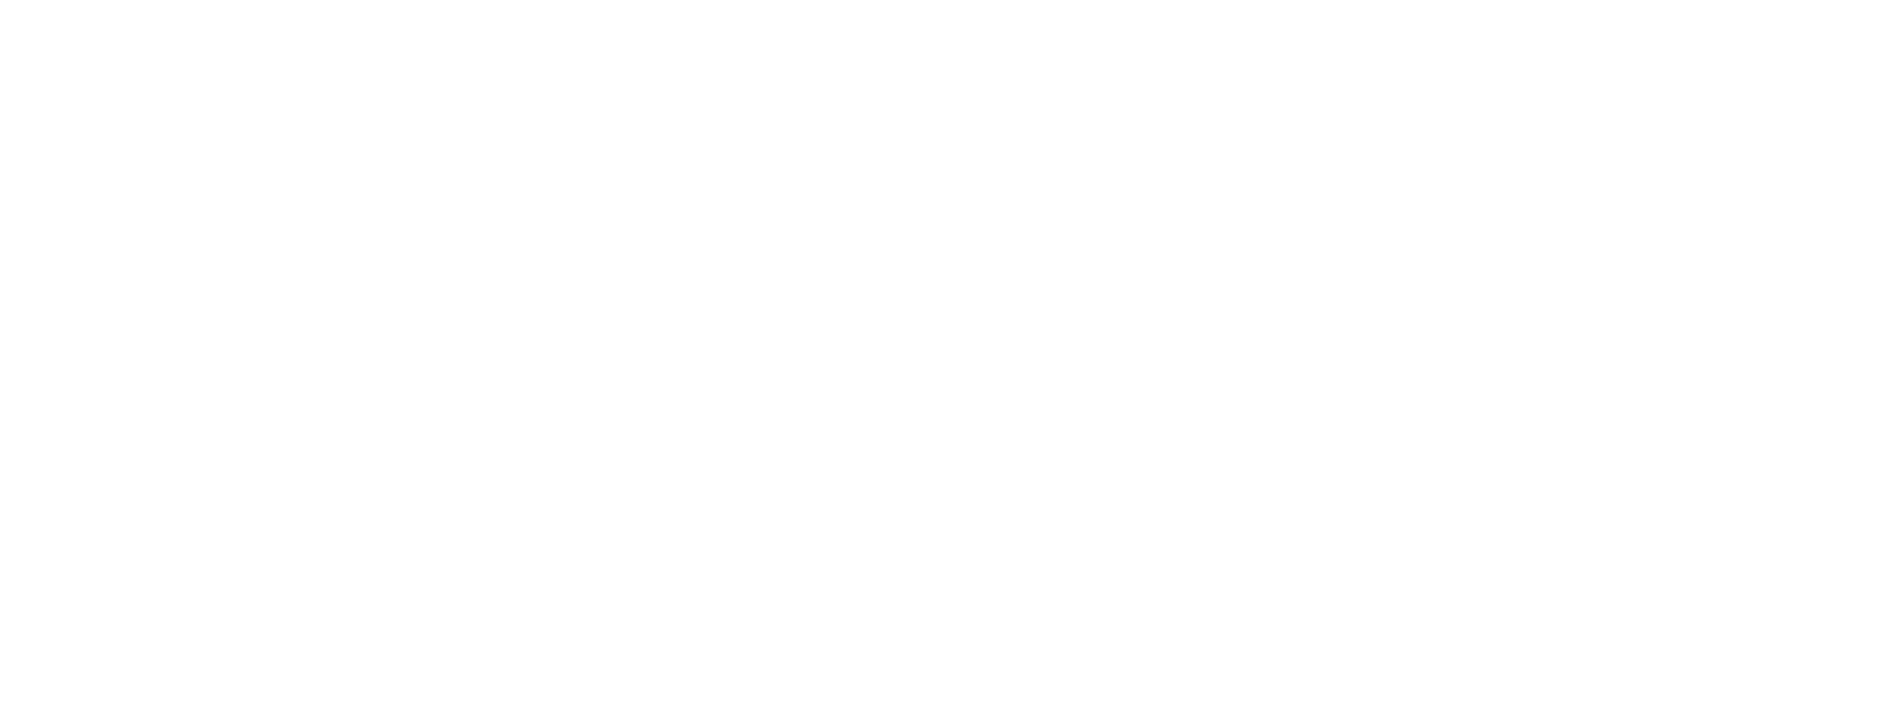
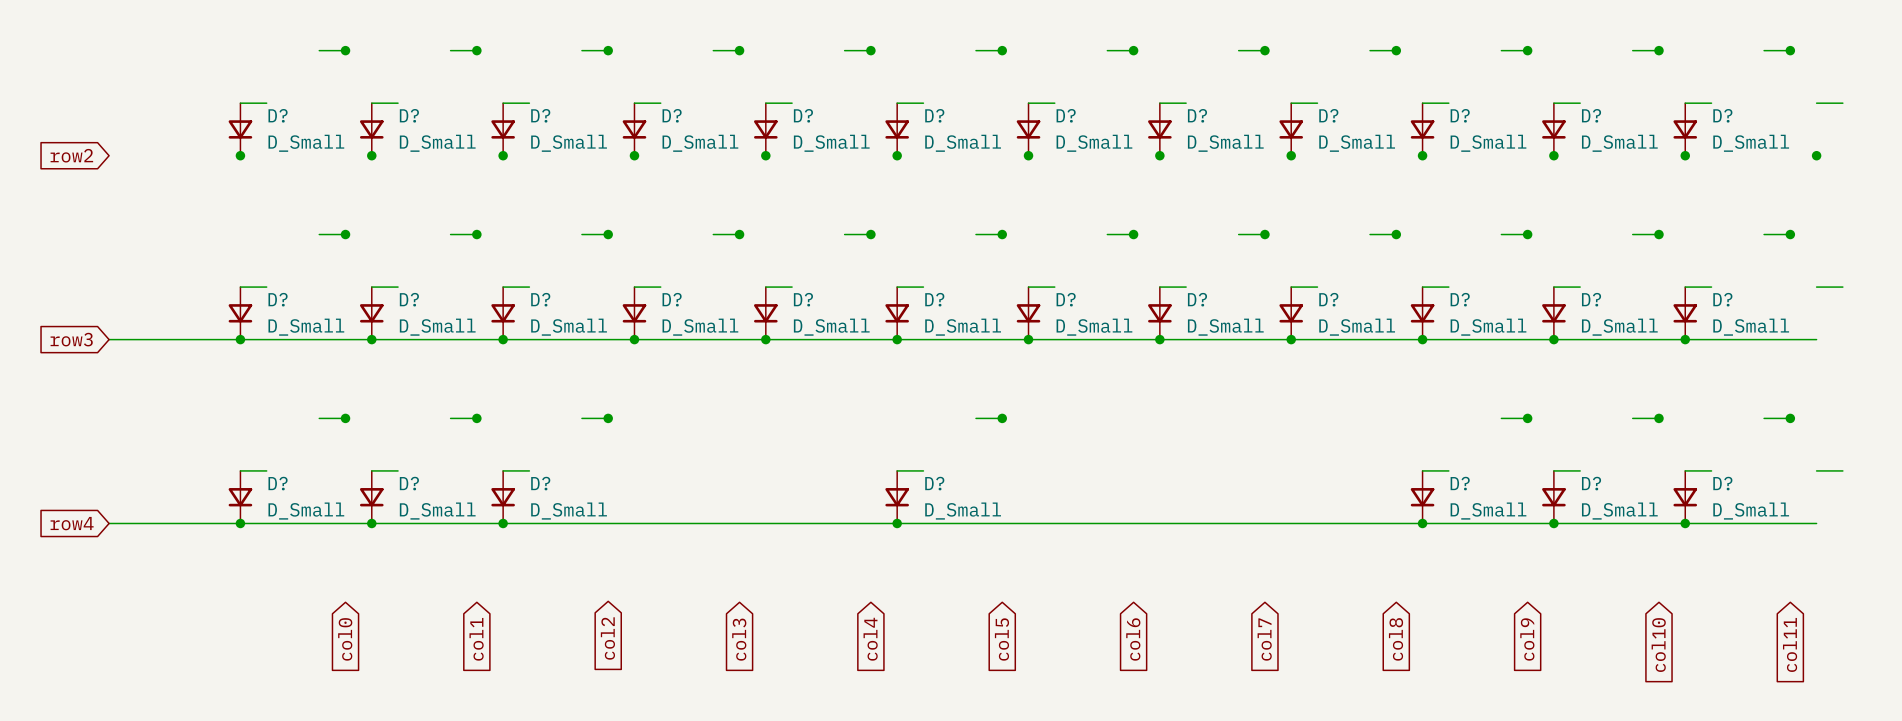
wire: none -> (319, 50) (345, 50)
junction: none -> (345, 50)
wire: none -> (450, 50) (476, 50)
junction: none -> (476, 50)
wire: none -> (581, 50) (608, 50)
junction: none -> (608, 50)
wire: none -> (713, 50) (739, 50)
junction: none -> (739, 50)
wire: none -> (844, 50) (870, 50)
junction: none -> (870, 50)
wire: none -> (975, 50) (1002, 50)
junction: none -> (1002, 50)
wire: none -> (1107, 50) (1133, 50)
junction: none -> (1133, 50)
wire: none -> (1238, 50) (1264, 50)
junction: none -> (1264, 50)
wire: none -> (1370, 50) (1396, 50)
junction: none -> (1396, 50)
wire: none -> (1501, 50) (1527, 50)
junction: none -> (1527, 50)
wire: none -> (1632, 50) (1658, 50)
junction: none -> (1658, 50)
wire: none -> (1764, 50) (1790, 50)
junction: none -> (1790, 50)
wire: none -> (240, 103) (266, 103)
wire: none -> (371, 103) (398, 103)
wire: none -> (503, 103) (529, 103)
wire: none -> (634, 103) (660, 103)
wire: none -> (765, 103) (792, 103)
wire: none -> (897, 103) (923, 103)
wire: none -> (1028, 103) (1054, 103)
wire: none -> (1159, 103) (1186, 103)
wire: none -> (1291, 103) (1317, 103)
wire: none -> (1422, 103) (1448, 103)
wire: none -> (1553, 103) (1580, 103)
wire: none -> (1685, 103) (1711, 103)
wire: none -> (1816, 103) (1842, 103)
D?: none -> D_Small (240, 129)
D?: none -> D_Small (371, 129)
D?: none -> D_Small (503, 129)
D?: none -> D_Small (634, 129)
D?: none -> D_Small (765, 129)
D?: none -> D_Small (897, 129)
D?: none -> D_Small (1028, 129)
D?: none -> D_Small (1159, 129)
D?: none -> D_Small (1291, 129)
D?: none -> D_Small (1422, 129)
D?: none -> D_Small (1553, 129)
D?: none -> D_Small (1685, 129)
global label: none -> row2 (71, 155)
junction: none -> (240, 155)
junction: none -> (371, 155)
junction: none -> (503, 155)
junction: none -> (634, 155)
junction: none -> (765, 155)
junction: none -> (897, 155)
junction: none -> (1028, 155)
junction: none -> (1159, 155)
junction: none -> (1291, 155)
junction: none -> (1422, 155)
junction: none -> (1553, 155)
junction: none -> (1685, 155)
junction: none -> (1816, 155)
wire: none -> (319, 234) (345, 234)
junction: none -> (345, 234)
wire: none -> (450, 234) (476, 234)
junction: none -> (476, 234)
wire: none -> (581, 234) (608, 234)
junction: none -> (608, 234)
wire: none -> (713, 234) (739, 234)
junction: none -> (739, 234)
wire: none -> (844, 234) (870, 234)
junction: none -> (870, 234)
wire: none -> (975, 234) (1002, 234)
junction: none -> (1002, 234)
wire: none -> (1107, 234) (1133, 234)
junction: none -> (1133, 234)
wire: none -> (1238, 234) (1264, 234)
junction: none -> (1264, 234)
wire: none -> (1370, 234) (1396, 234)
junction: none -> (1396, 234)
wire: none -> (1501, 234) (1527, 234)
junction: none -> (1527, 234)
wire: none -> (1632, 234) (1658, 234)
junction: none -> (1658, 234)
wire: none -> (1764, 234) (1790, 234)
junction: none -> (1790, 234)
wire: none -> (240, 287) (266, 287)
wire: none -> (371, 287) (398, 287)
wire: none -> (503, 287) (529, 287)
wire: none -> (634, 287) (660, 287)
wire: none -> (765, 287) (792, 287)
wire: none -> (897, 287) (923, 287)
wire: none -> (1028, 287) (1054, 287)
wire: none -> (1159, 287) (1186, 287)
wire: none -> (1291, 287) (1317, 287)
wire: none -> (1422, 287) (1448, 287)
wire: none -> (1553, 287) (1580, 287)
wire: none -> (1685, 287) (1711, 287)
wire: none -> (1816, 287) (1842, 287)
D?: none -> D_Small (240, 313)
D?: none -> D_Small (371, 313)
D?: none -> D_Small (503, 313)
D?: none -> D_Small (634, 313)
D?: none -> D_Small (765, 313)
D?: none -> D_Small (897, 313)
D?: none -> D_Small (1028, 313)
D?: none -> D_Small (1159, 313)
D?: none -> D_Small (1291, 313)
D?: none -> D_Small (1422, 313)
D?: none -> D_Small (1553, 313)
D?: none -> D_Small (1685, 313)
global label: none -> row3 (71, 339)
wire: none -> (109, 339) (1816, 339)
junction: none -> (240, 339)
junction: none -> (371, 339)
junction: none -> (503, 339)
junction: none -> (634, 339)
junction: none -> (765, 339)
junction: none -> (897, 339)
junction: none -> (1028, 339)
junction: none -> (1159, 339)
junction: none -> (1291, 339)
junction: none -> (1422, 339)
junction: none -> (1553, 339)
junction: none -> (1685, 339)
wire: none -> (319, 418) (345, 418)
junction: none -> (345, 418)
wire: none -> (450, 418) (476, 418)
junction: none -> (476, 418)
wire: none -> (581, 418) (608, 418)
junction: none -> (608, 418)
wire: none -> (975, 418) (1002, 418)
junction: none -> (1002, 418)
wire: none -> (1501, 418) (1527, 418)
junction: none -> (1527, 418)
wire: none -> (1632, 418) (1658, 418)
junction: none -> (1658, 418)
wire: none -> (1764, 418) (1790, 418)
junction: none -> (1790, 418)
wire: none -> (240, 470) (266, 470)
wire: none -> (371, 470) (398, 470)
wire: none -> (503, 470) (529, 470)
wire: none -> (897, 470) (923, 470)
wire: none -> (1422, 470) (1448, 470)
wire: none -> (1553, 470) (1580, 470)
wire: none -> (1685, 470) (1711, 470)
wire: none -> (1816, 470) (1842, 470)
D?: none -> D_Small (240, 497)
D?: none -> D_Small (371, 497)
D?: none -> D_Small (503, 497)
D?: none -> D_Small (897, 497)
D?: none -> D_Small (1422, 497)
D?: none -> D_Small (1553, 497)
D?: none -> D_Small (1685, 497)
global label: none -> row4 (72, 523)
wire: none -> (109, 523) (1816, 523)
junction: none -> (240, 523)
junction: none -> (371, 523)
junction: none -> (503, 523)
junction: none -> (897, 523)
junction: none -> (1422, 523)
junction: none -> (1553, 523)
junction: none -> (1685, 523)
global label: none -> col2 (607, 638)
global label: none -> col0 (345, 639)
global label: none -> col1 (476, 639)
global label: none -> col3 (739, 639)
global label: none -> col4 (870, 639)
global label: none -> col5 (1001, 639)
global label: none -> col6 (1133, 639)
global label: none -> col7 (1264, 639)
global label: none -> col8 (1396, 639)
global label: none -> col9 (1527, 639)
global label: none -> col10 (1658, 645)
global label: none -> col11 (1790, 644)

